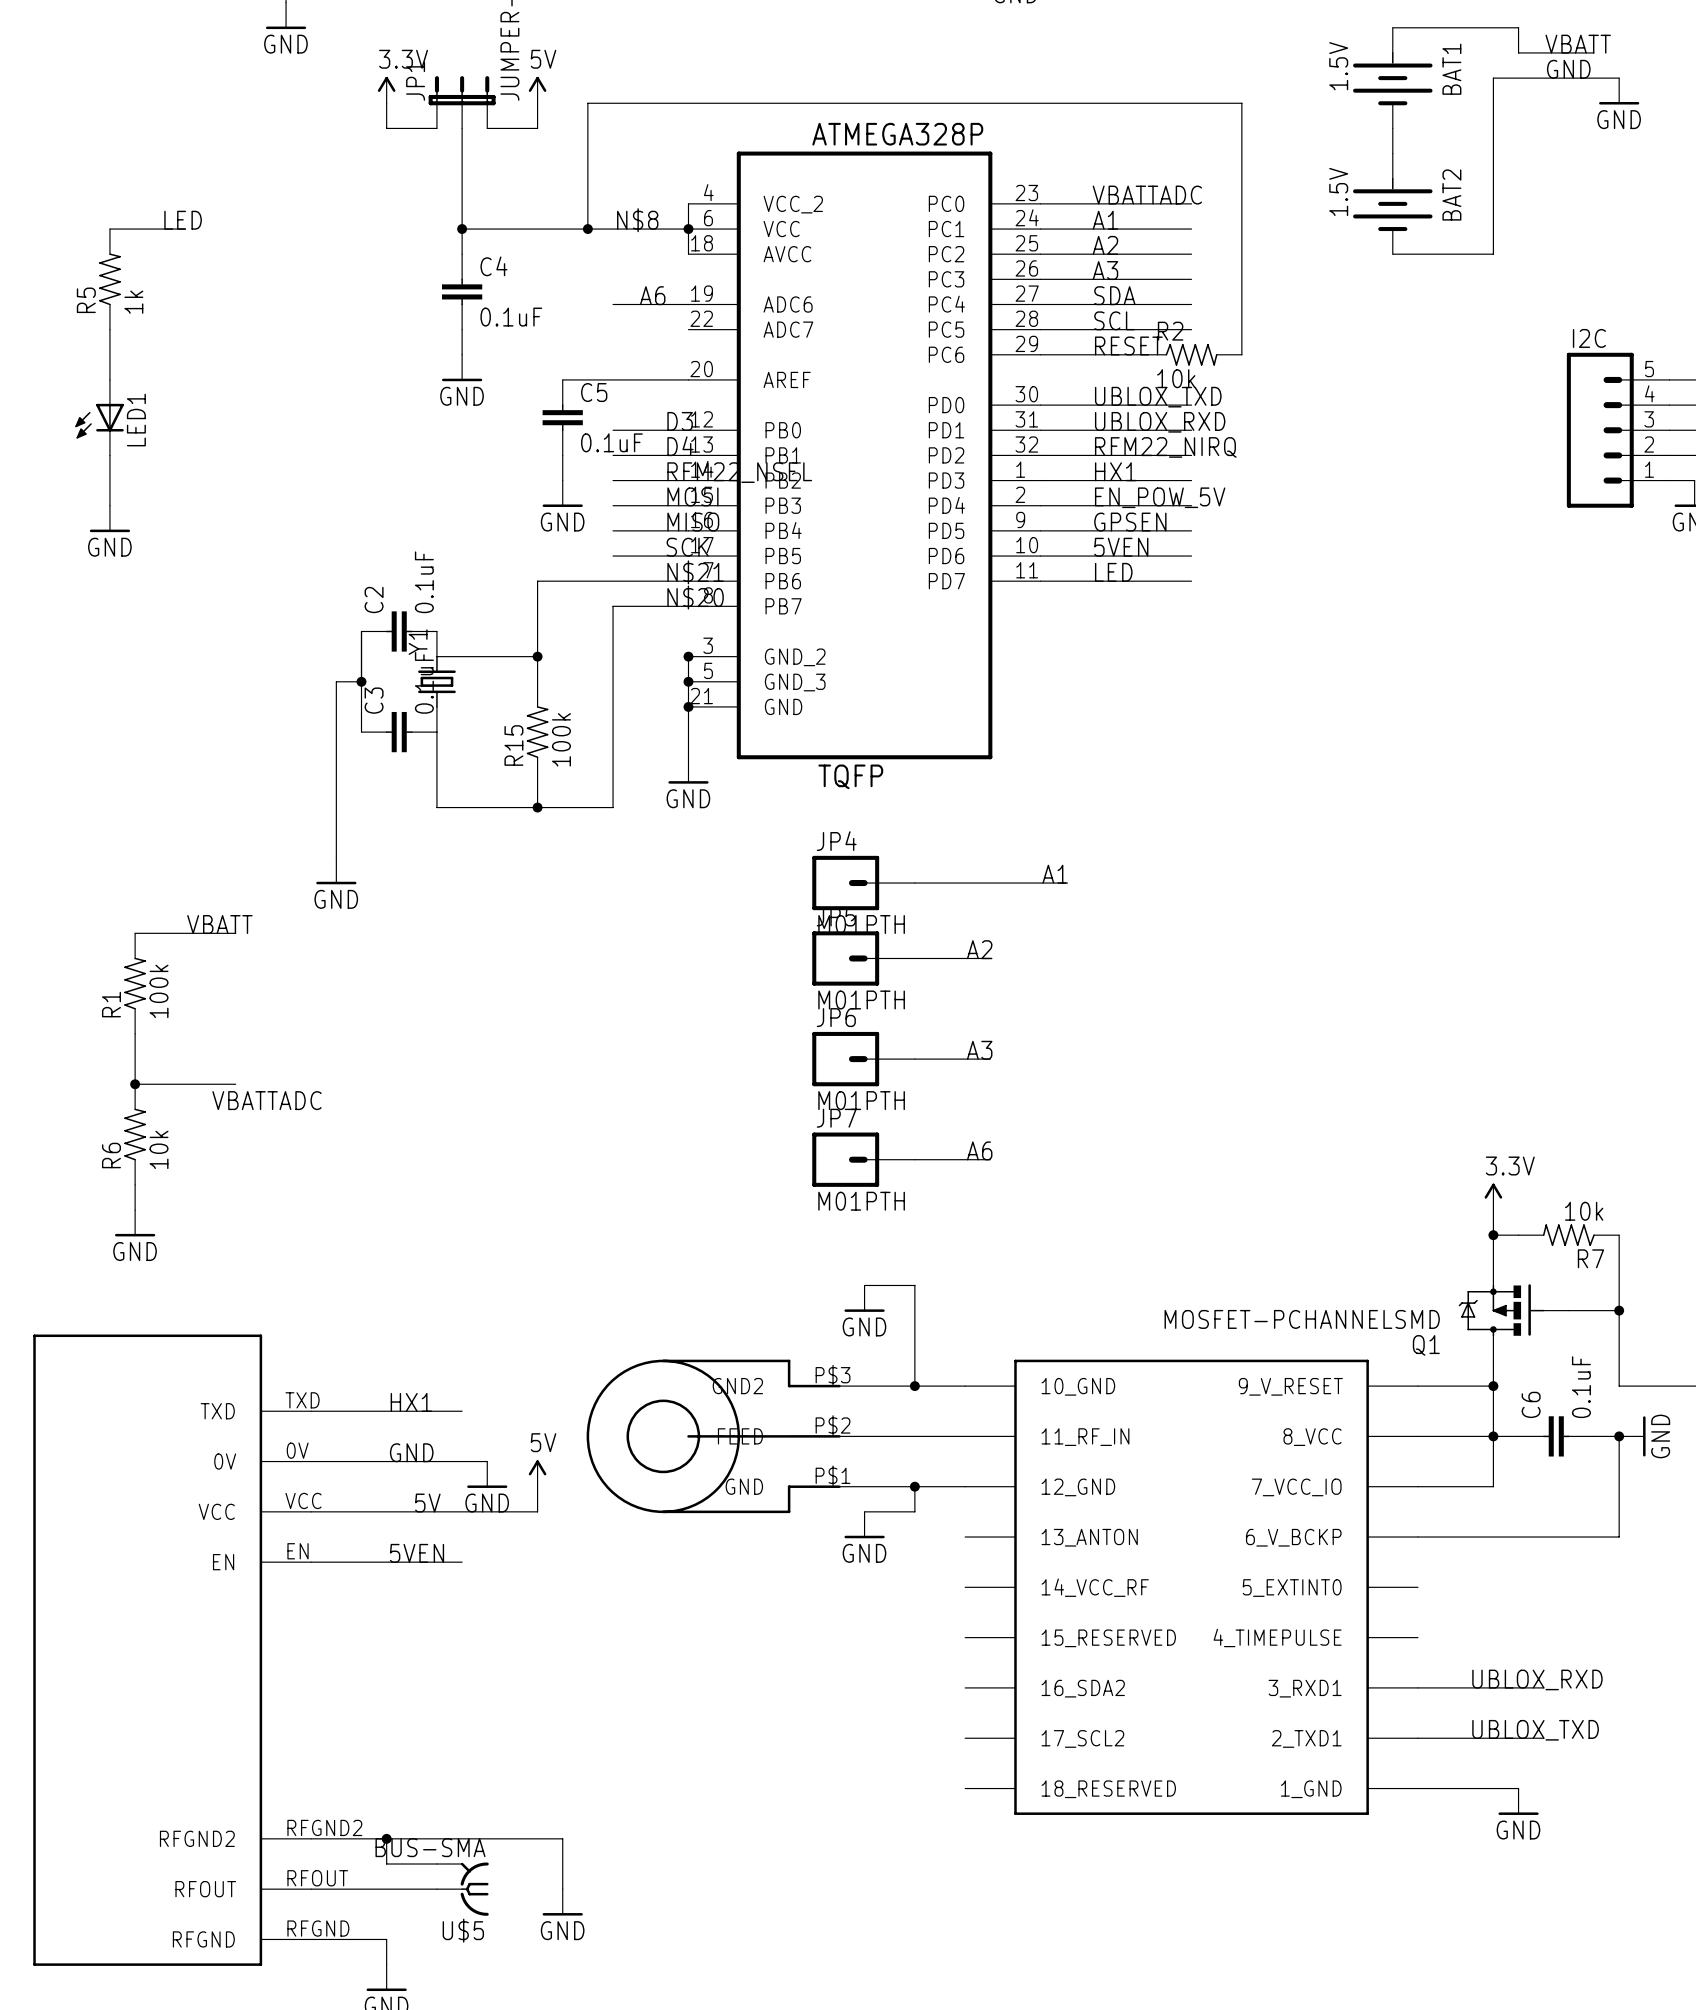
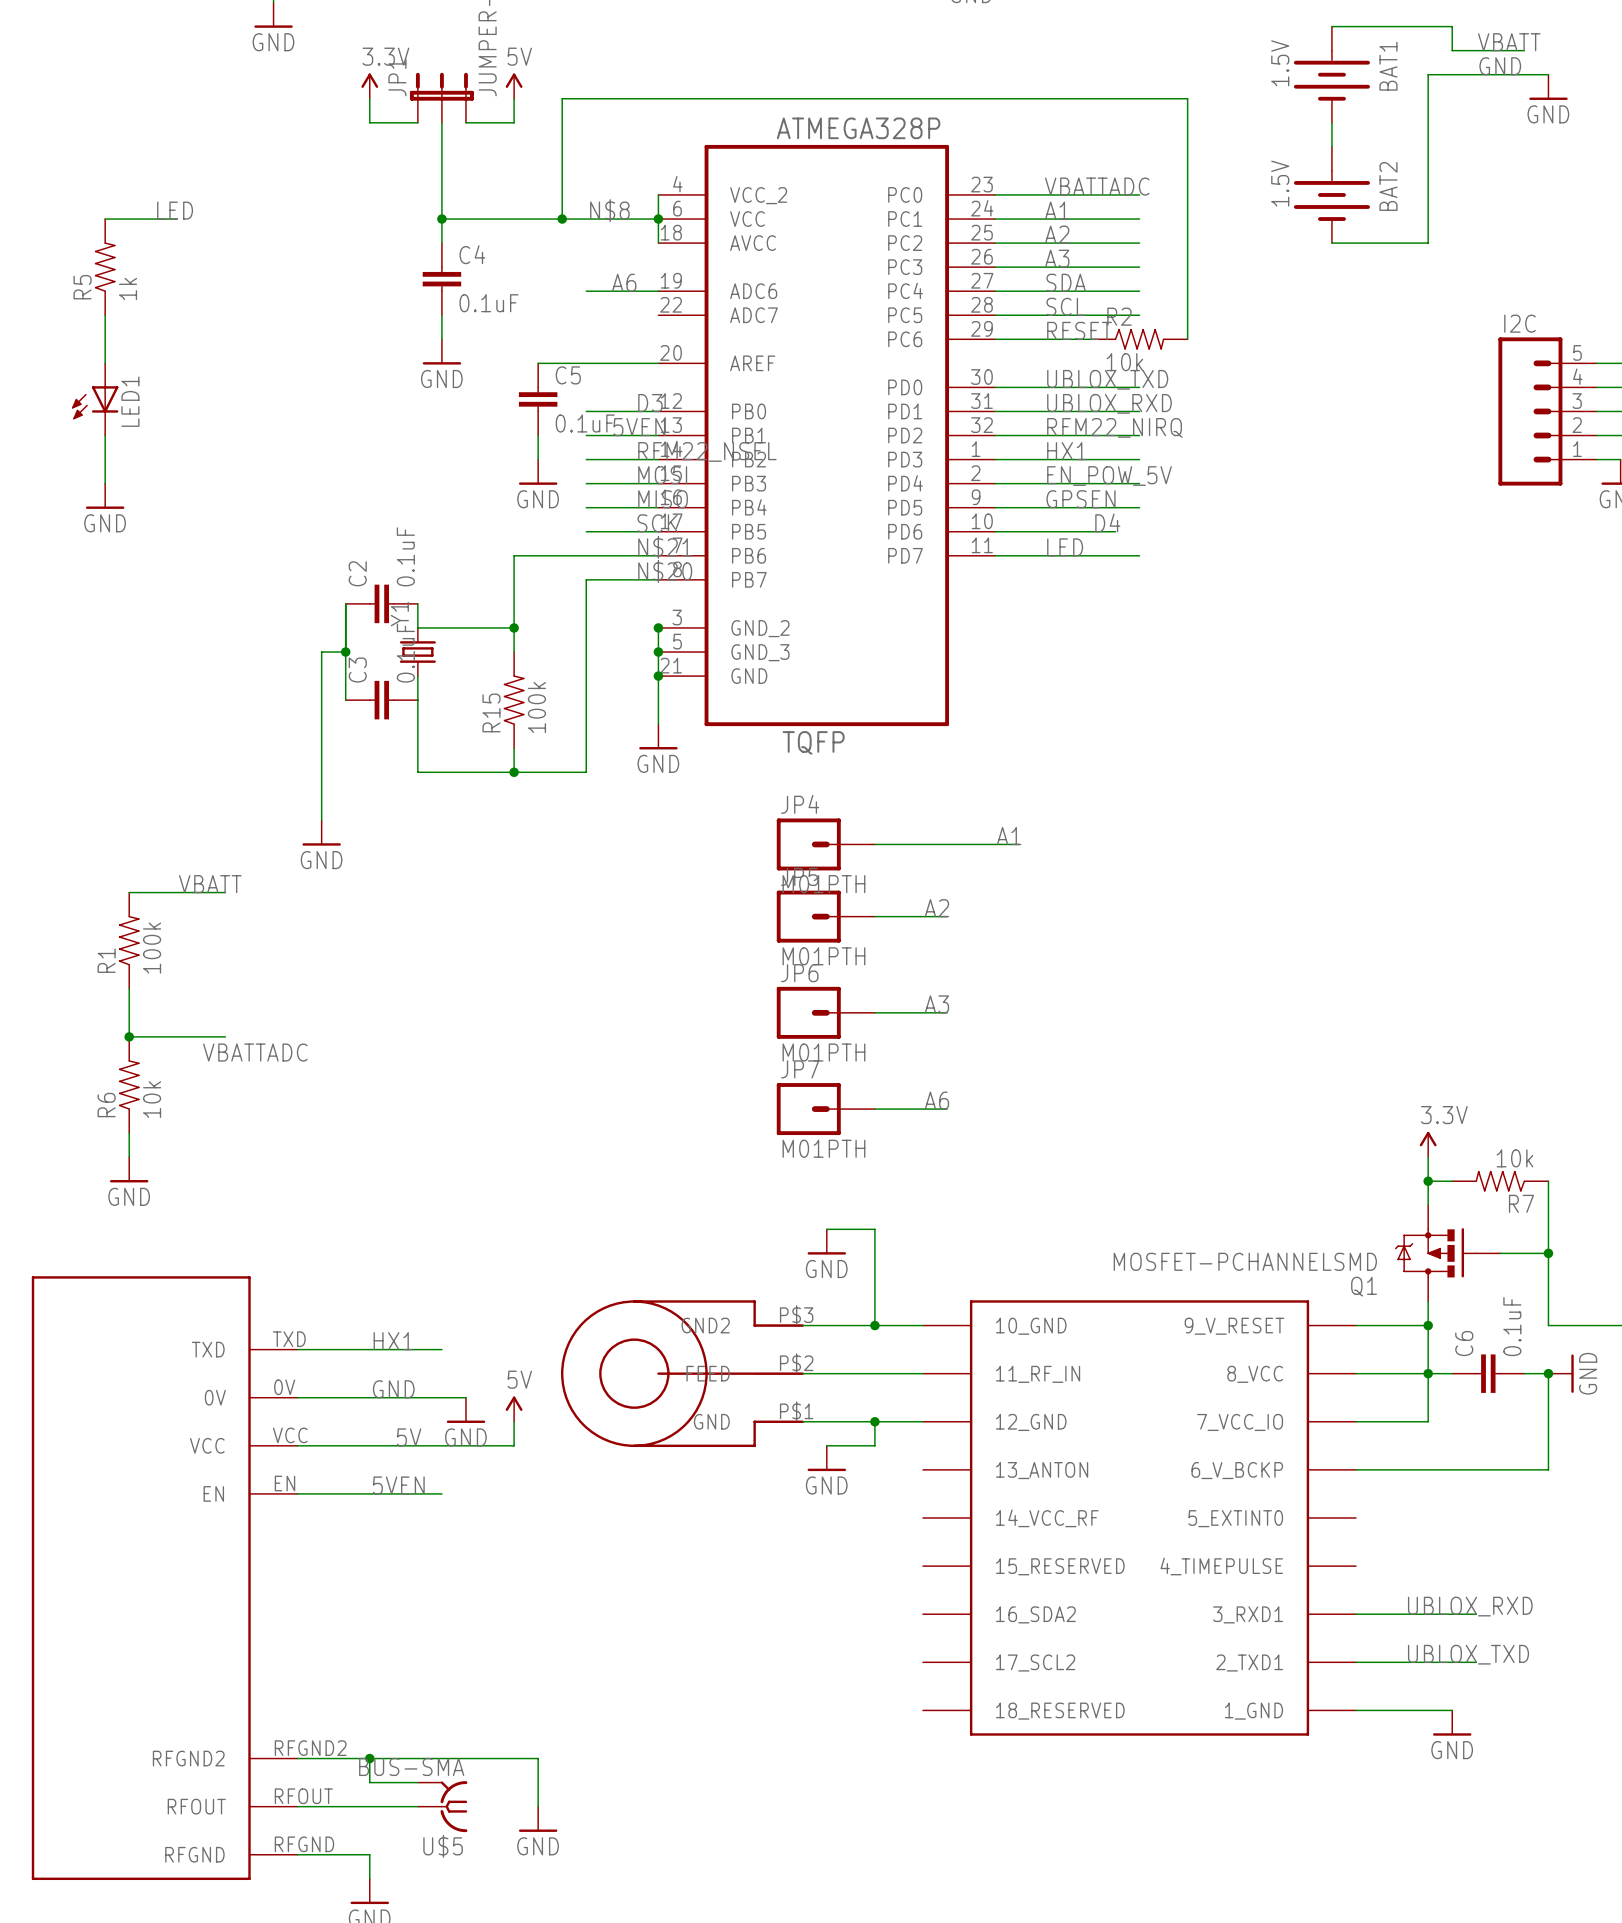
label: none -> 5VEN (639, 427)
label: D4 (680, 446) -> none
label: none -> D4 (1107, 522)
label: 5VEN (1121, 547) -> none
wire: (1166, 556) (1191, 556) -> none

